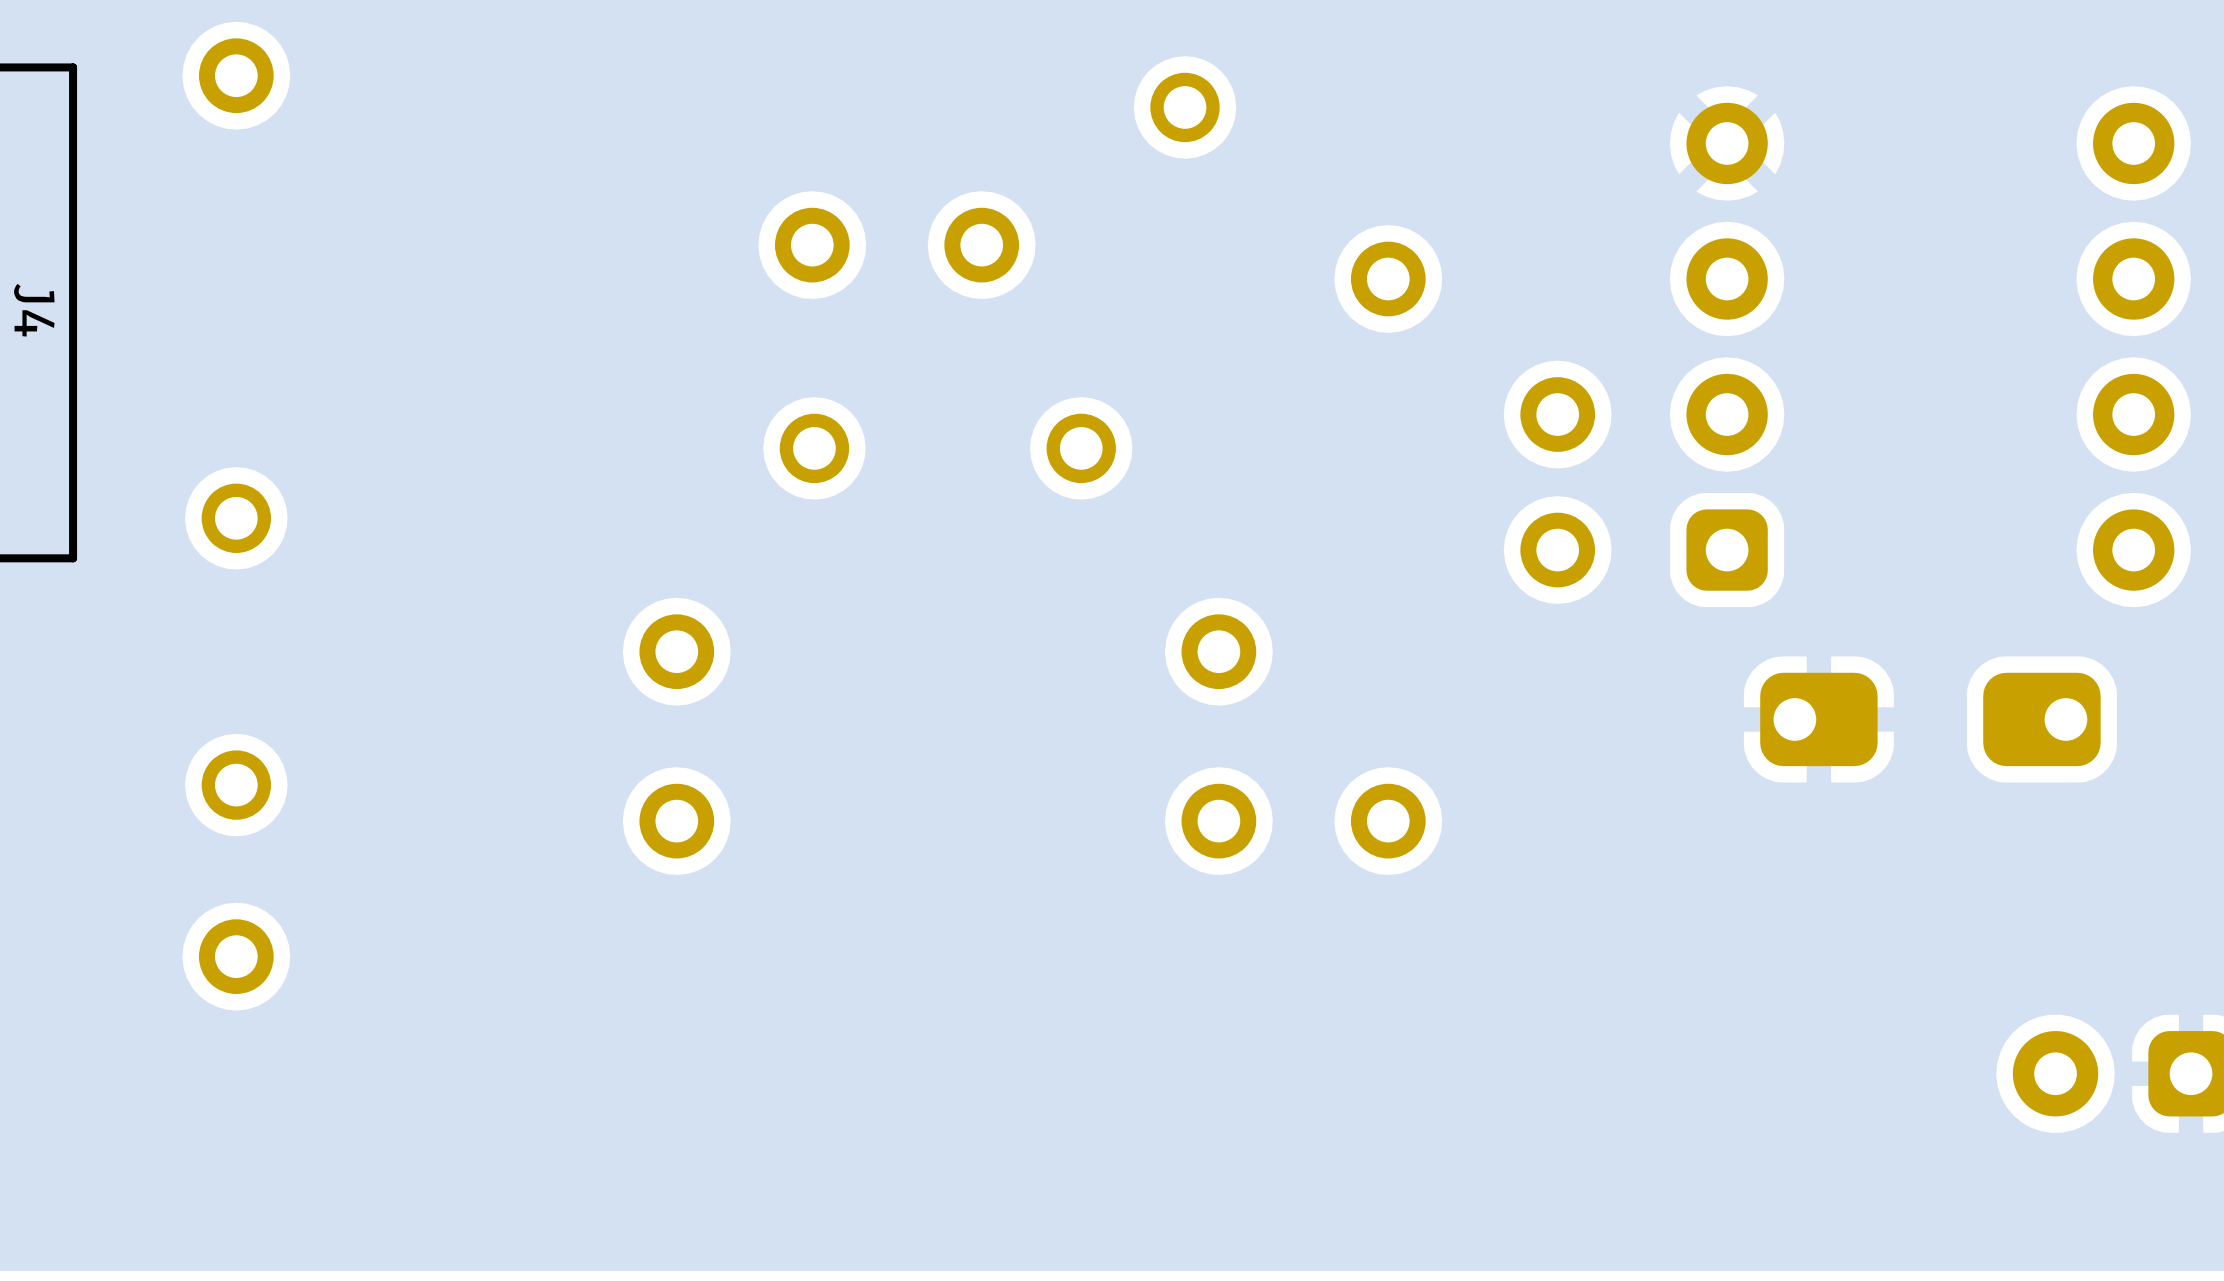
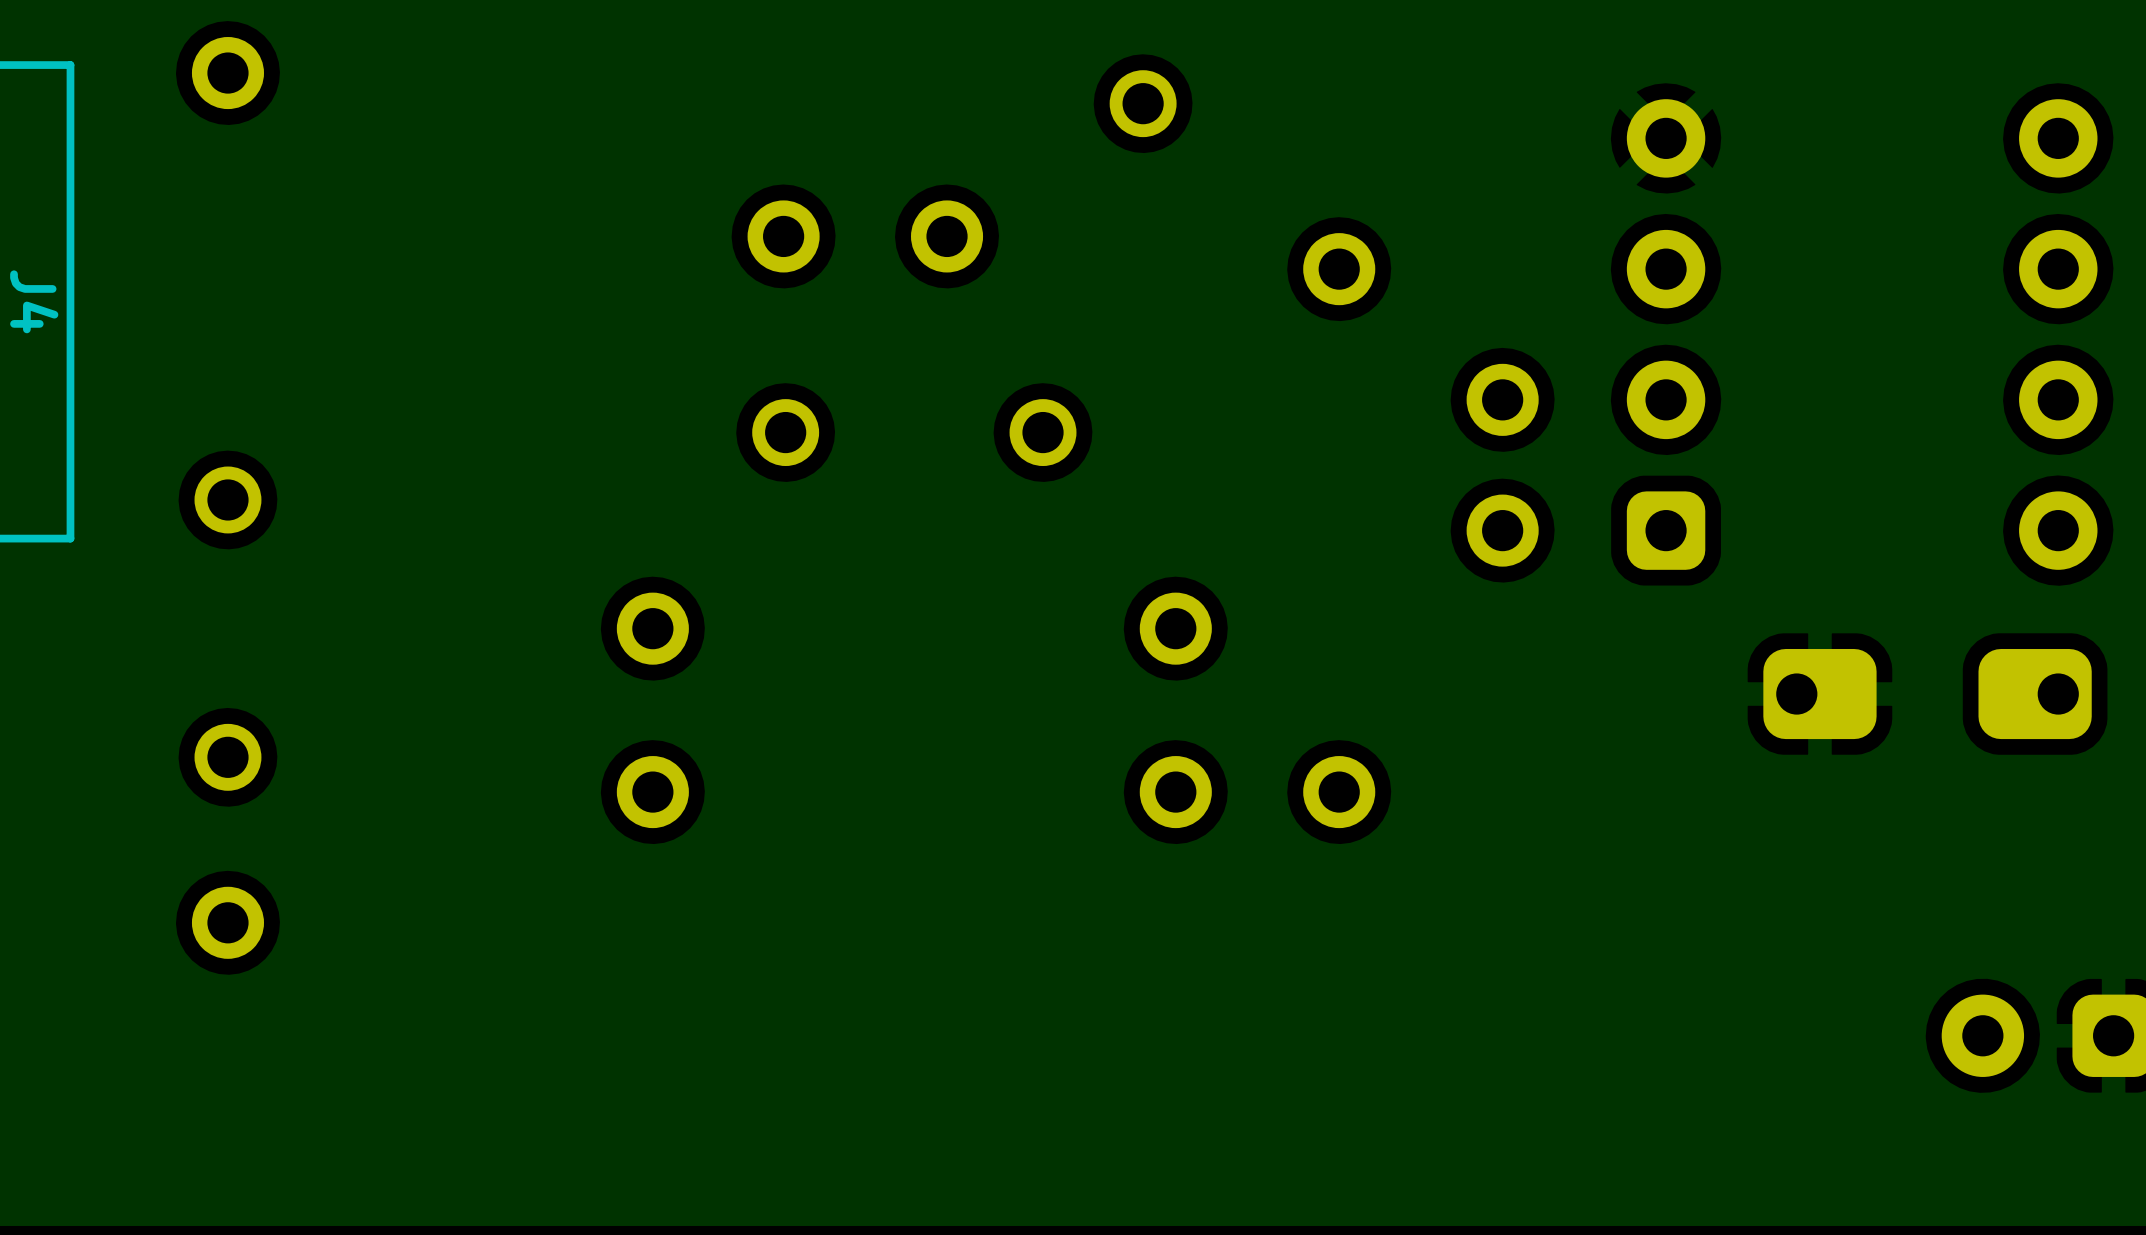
part position: (1930, 719) -> (1927, 694)

